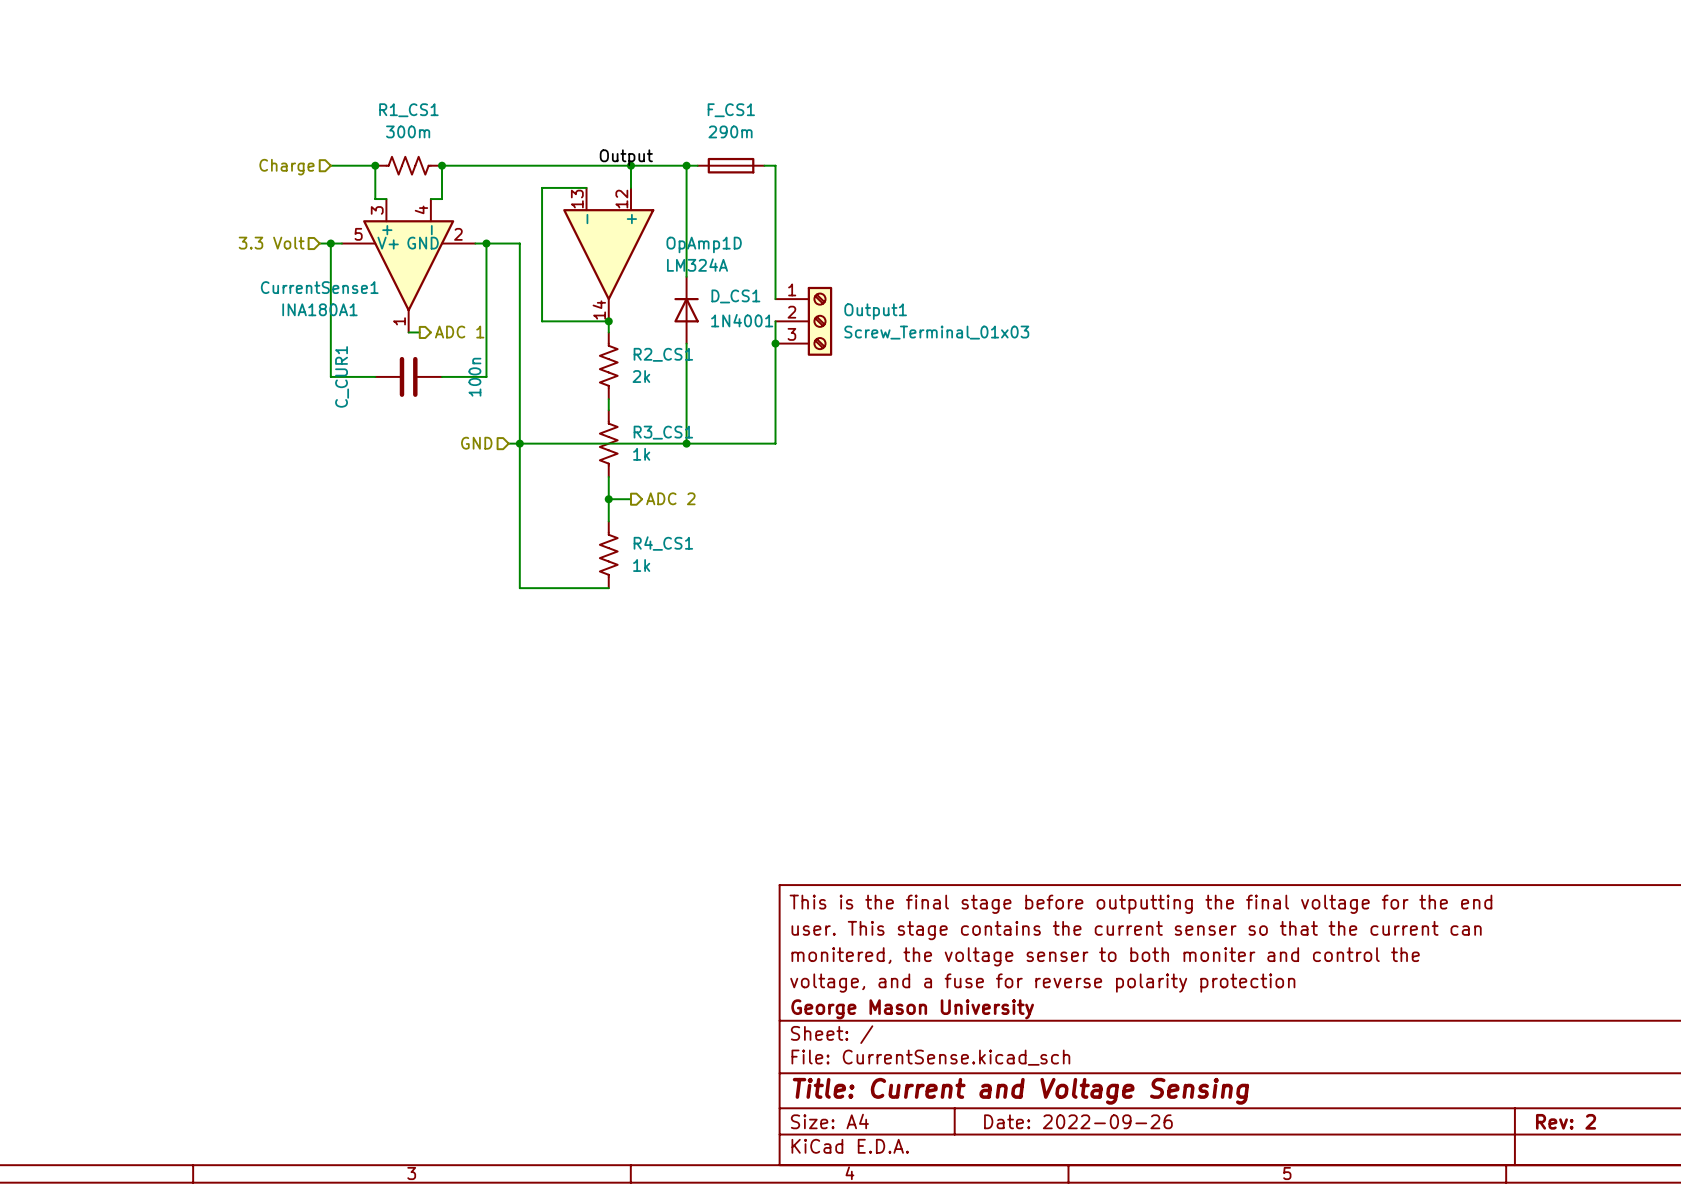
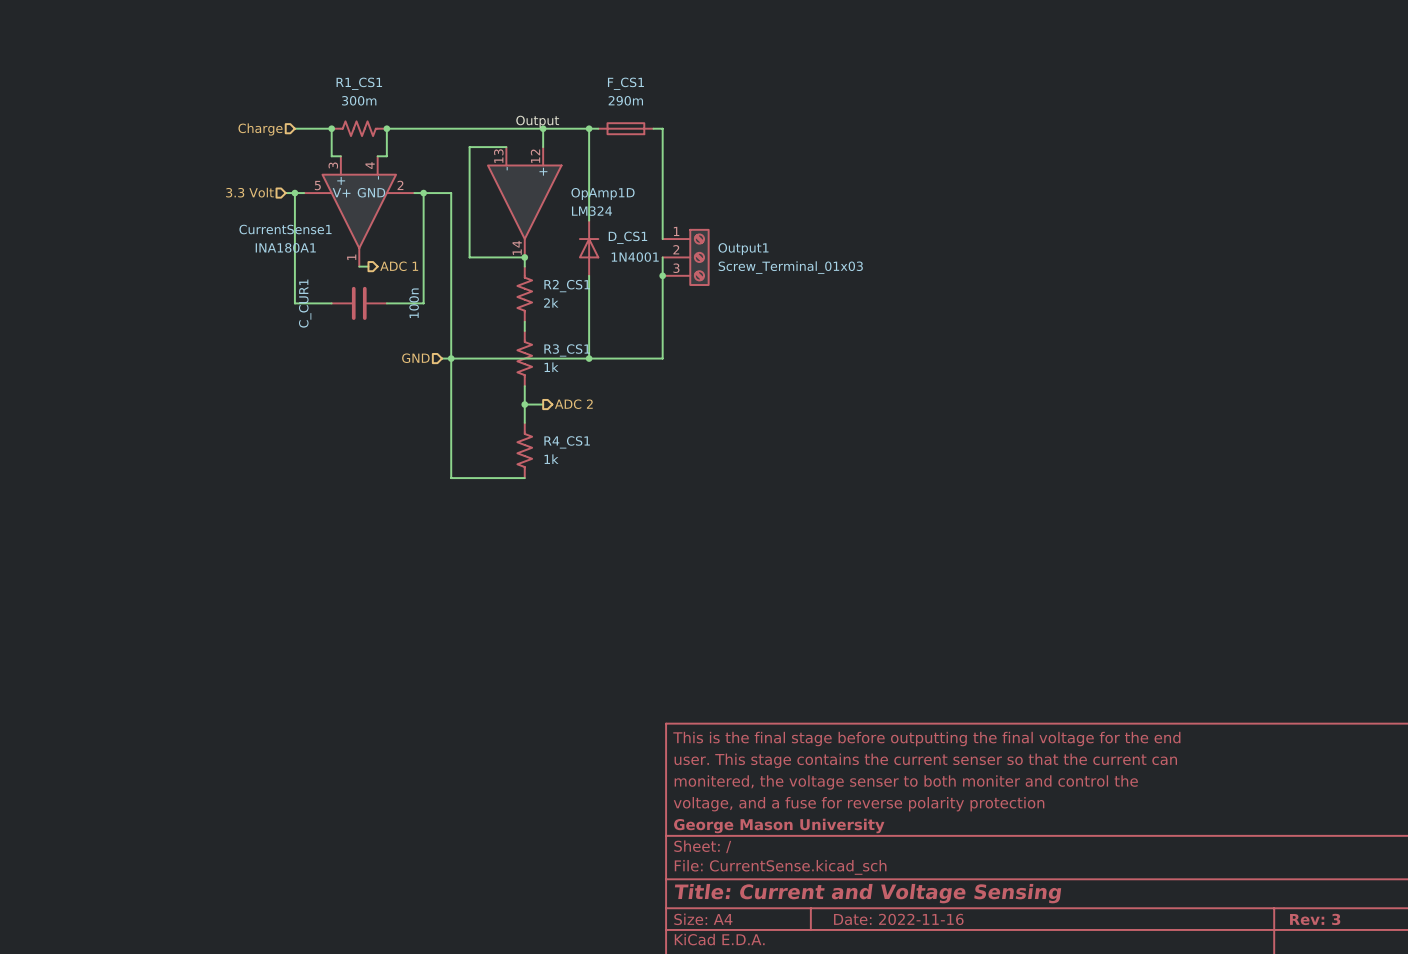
OpAmp1D value: LM324A (697, 265) -> LM324 (591, 211)
title block: Date: 2022-09-26 (1078, 1121) -> Date: 2022-11-16 (898, 919)
title block: Rev: 2 (1566, 1121) -> Rev: 3 (1315, 919)

